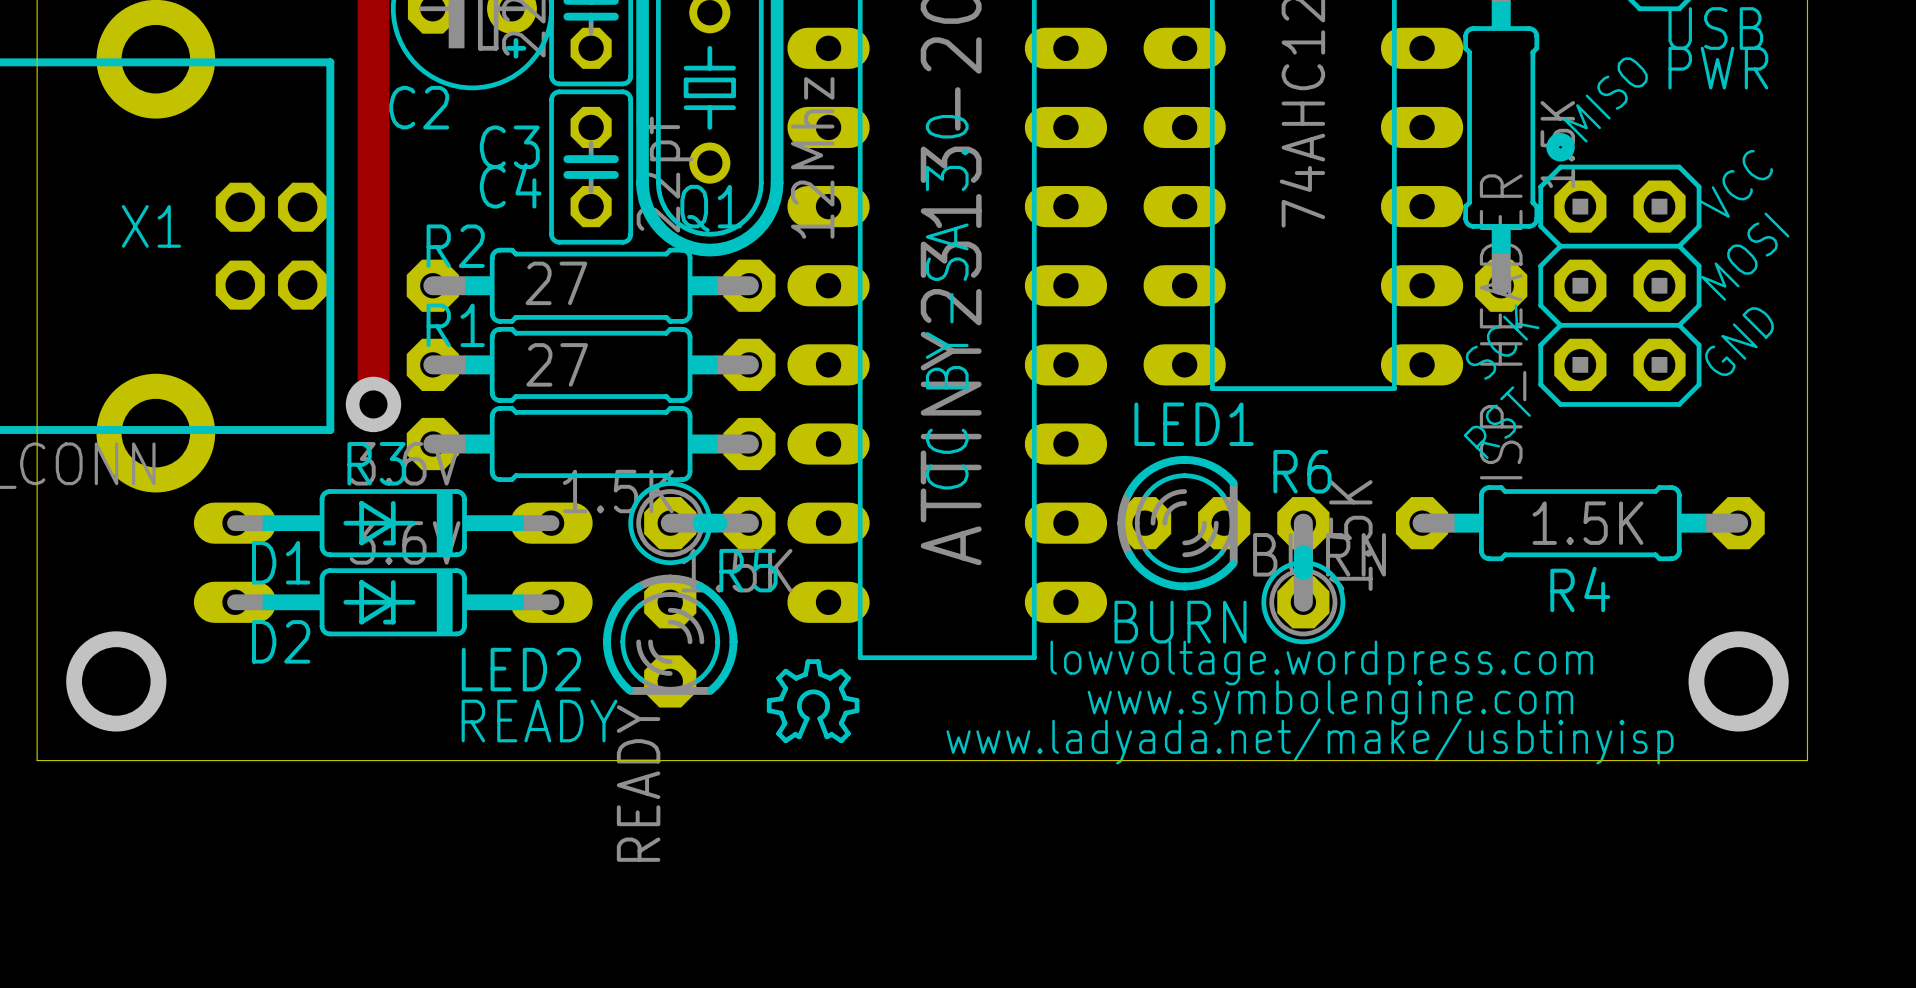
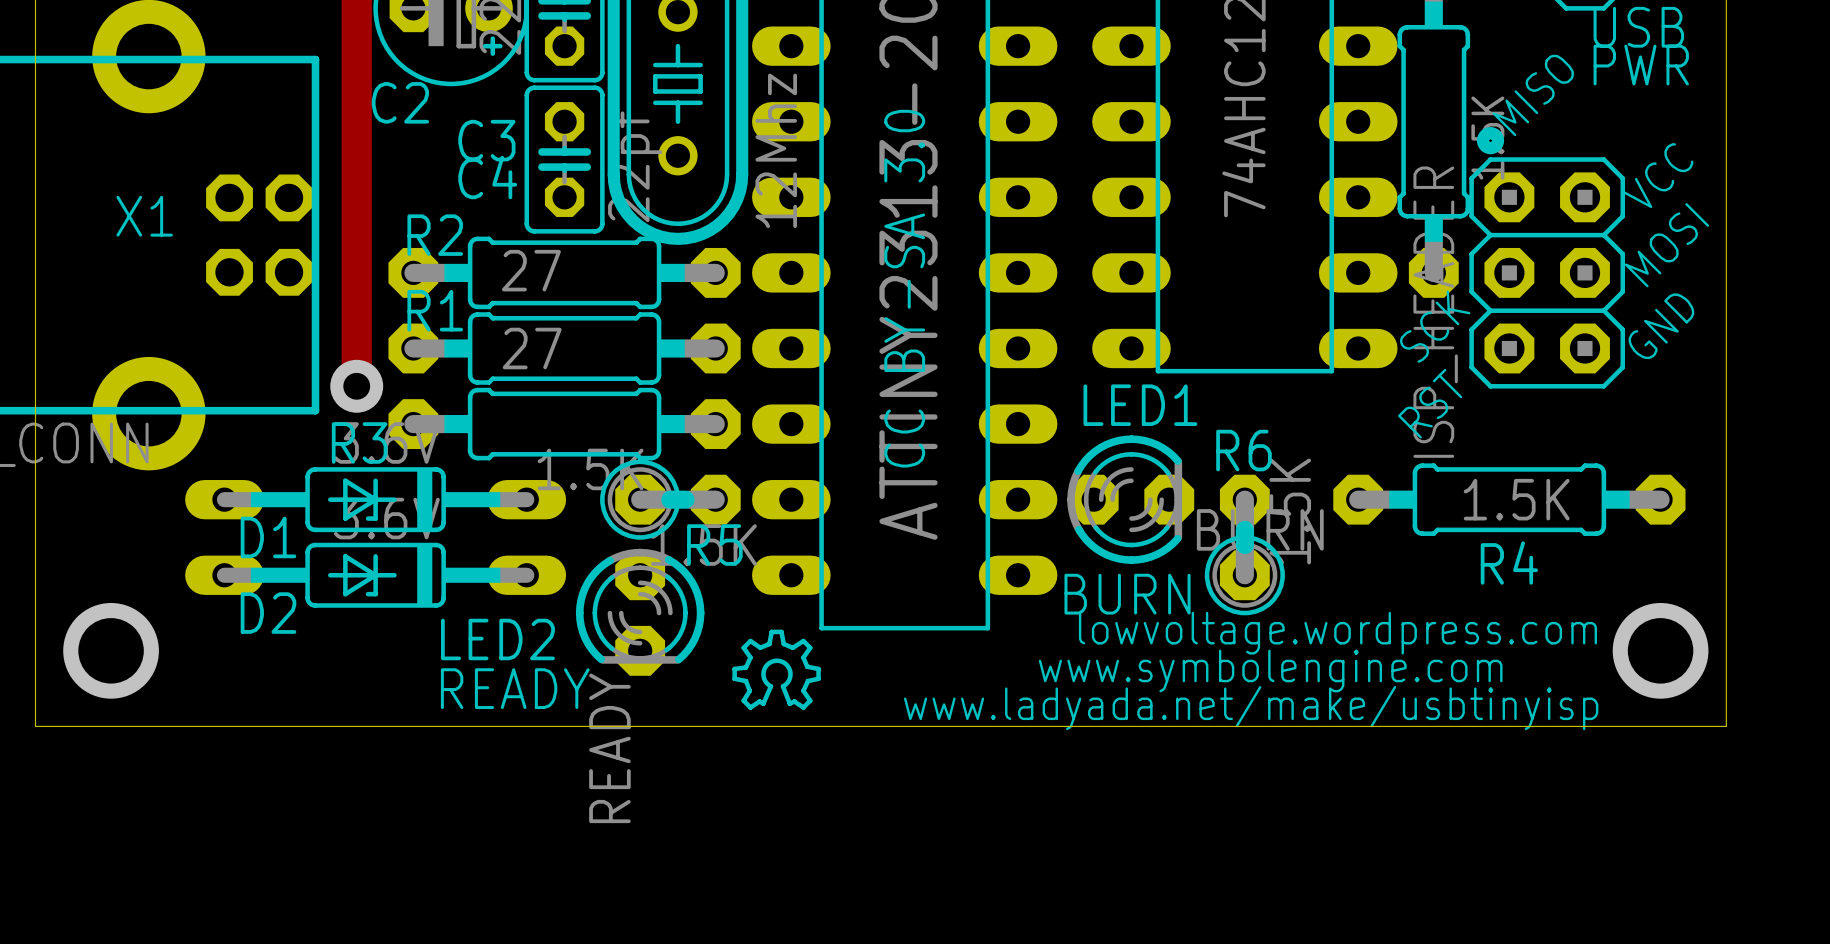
Q1 name: Q1 (711, 208) -> none
text position: lowvoltage.wordpress.com (1321, 662) -> lowvoltage.wordpress.com (1337, 633)

